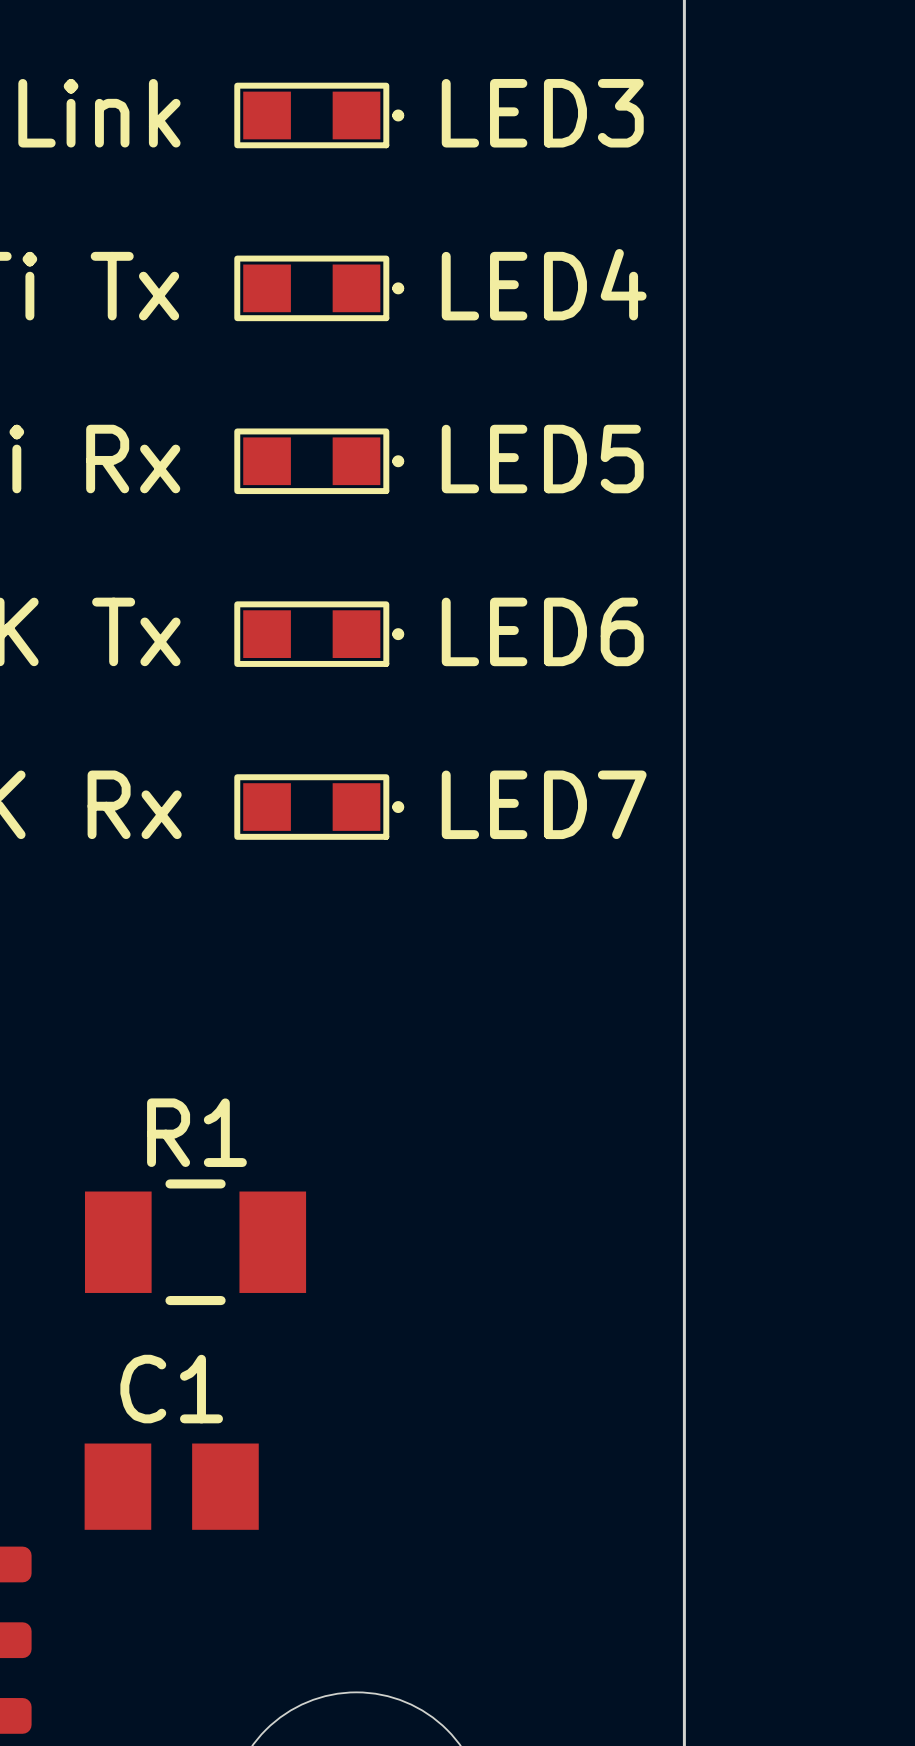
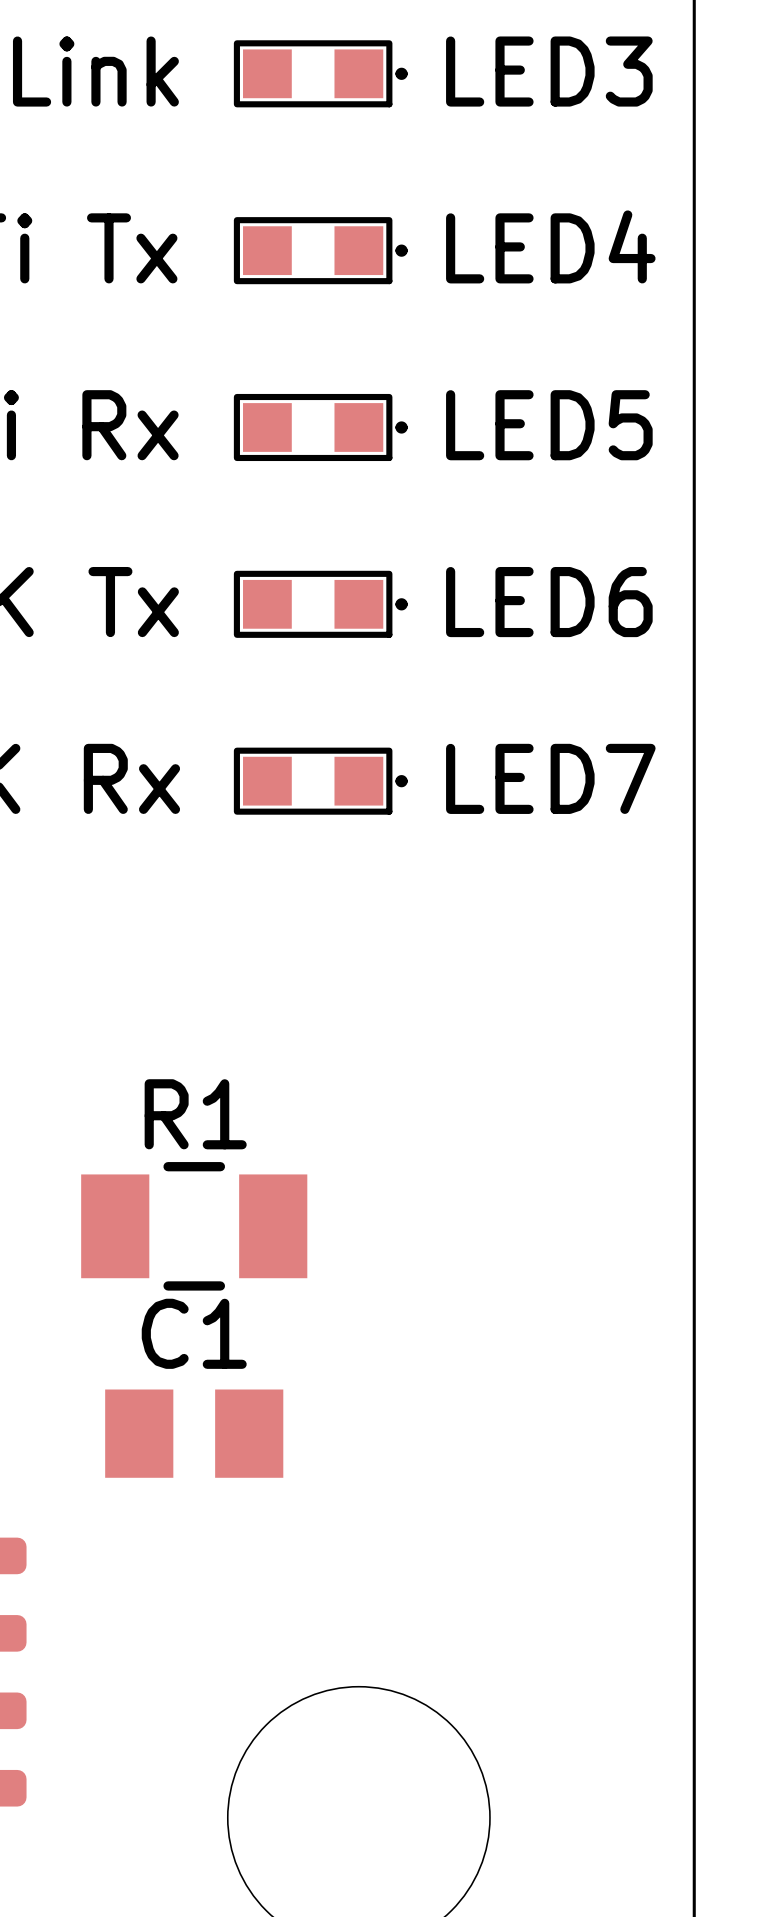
C1 position: (171, 1486) -> (194, 1433)

